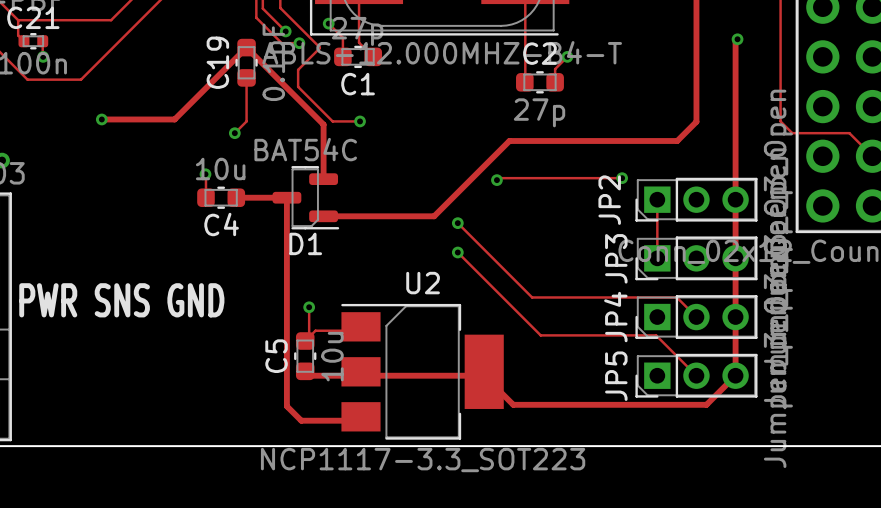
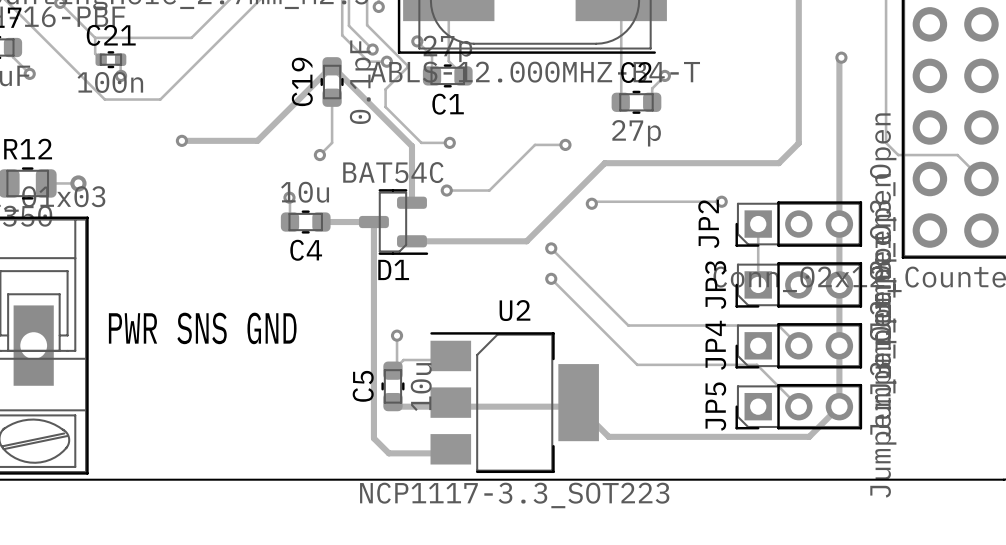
track: none -> (565, 144) (535, 144) (489, 190) (446, 190)
via: none -> (565, 144)
via: none -> (446, 190)

